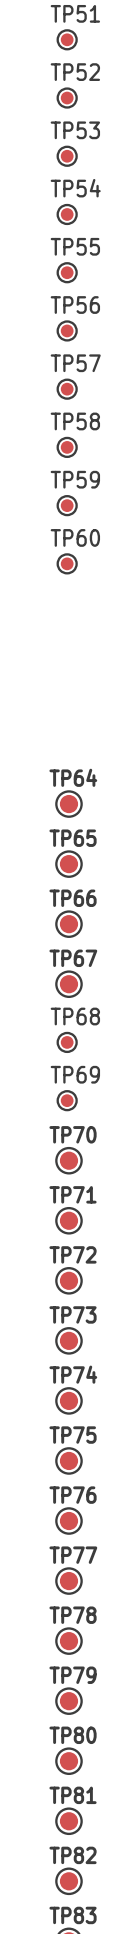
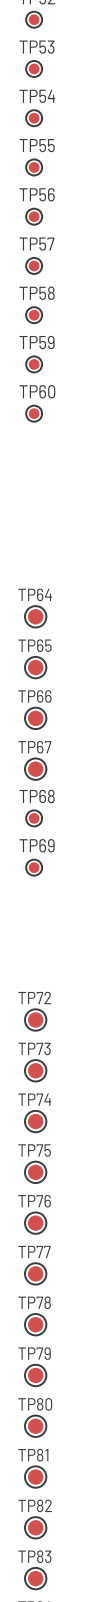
TP70: (68, 1160) -> none
TP71: (68, 1220) -> none

